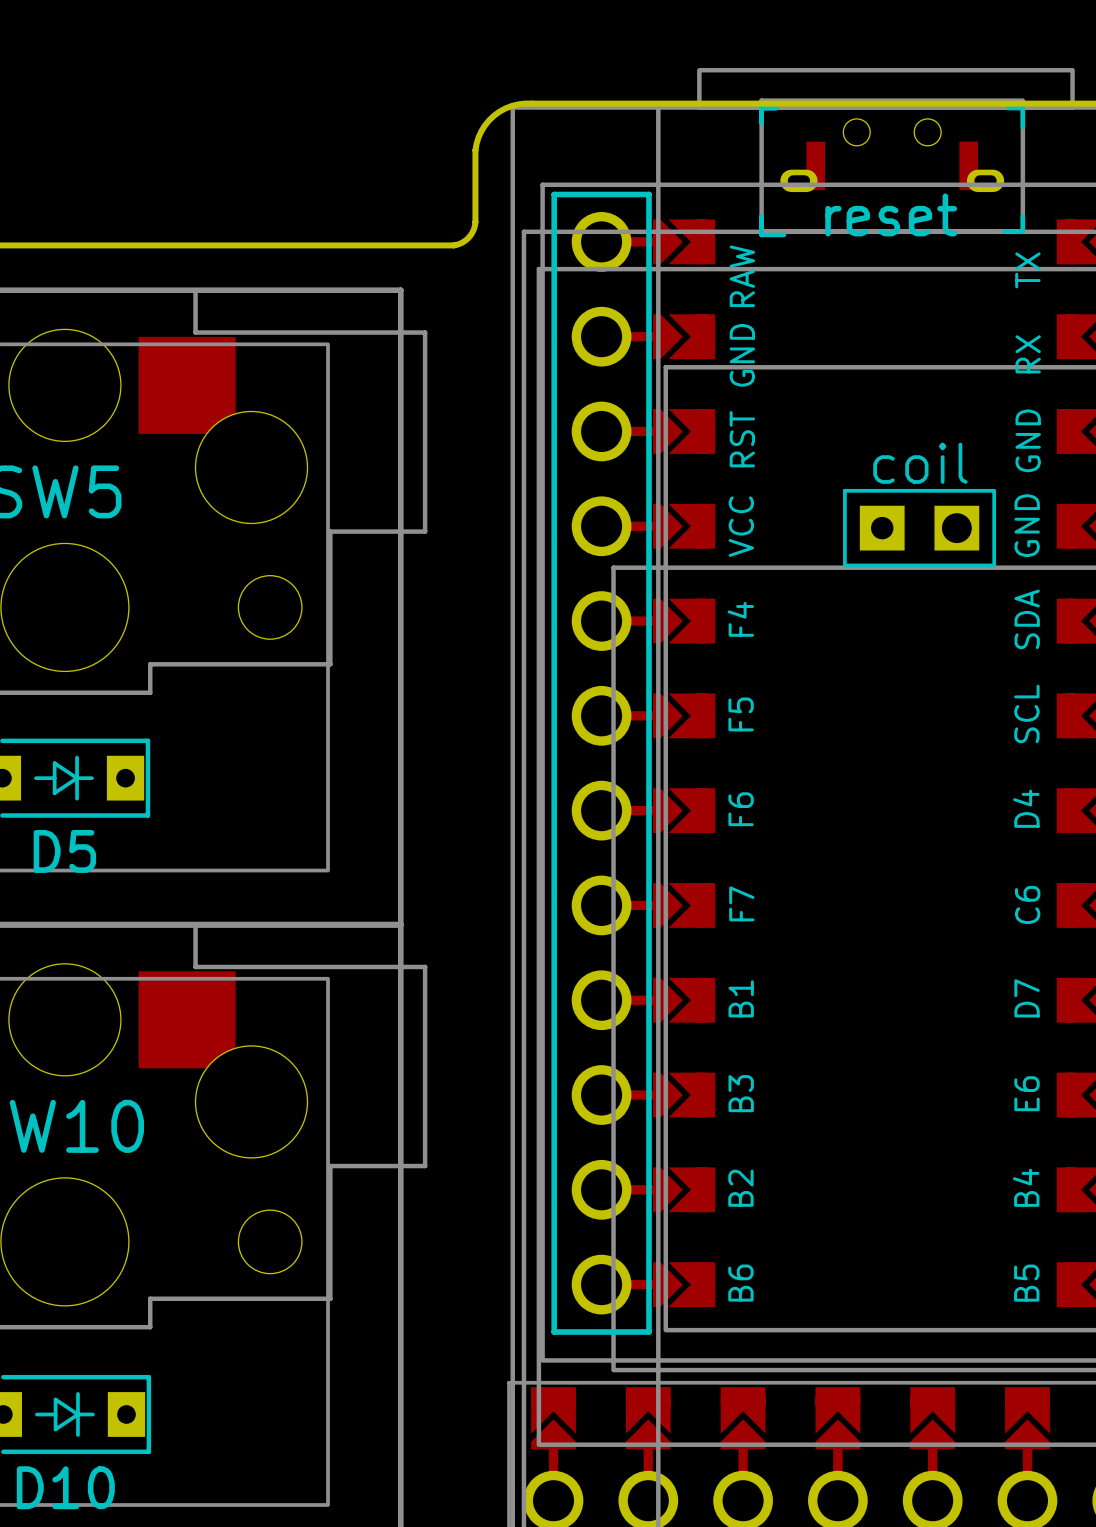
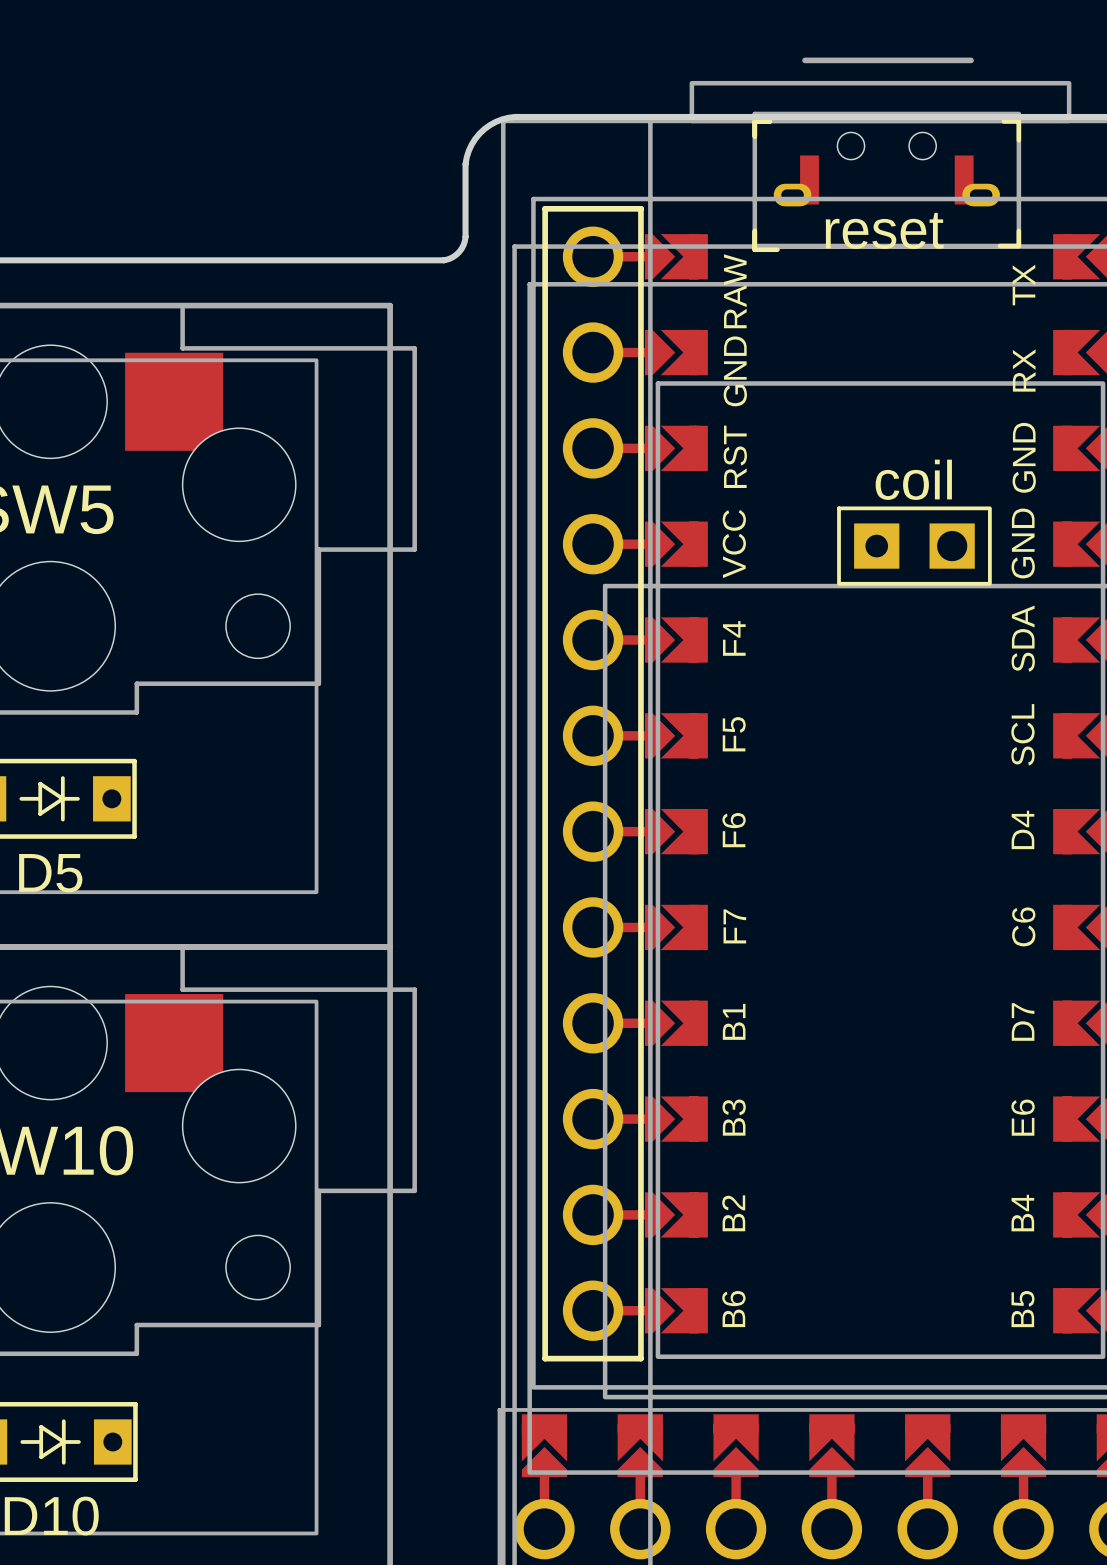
line: none -> (805, 60) (971, 60)

